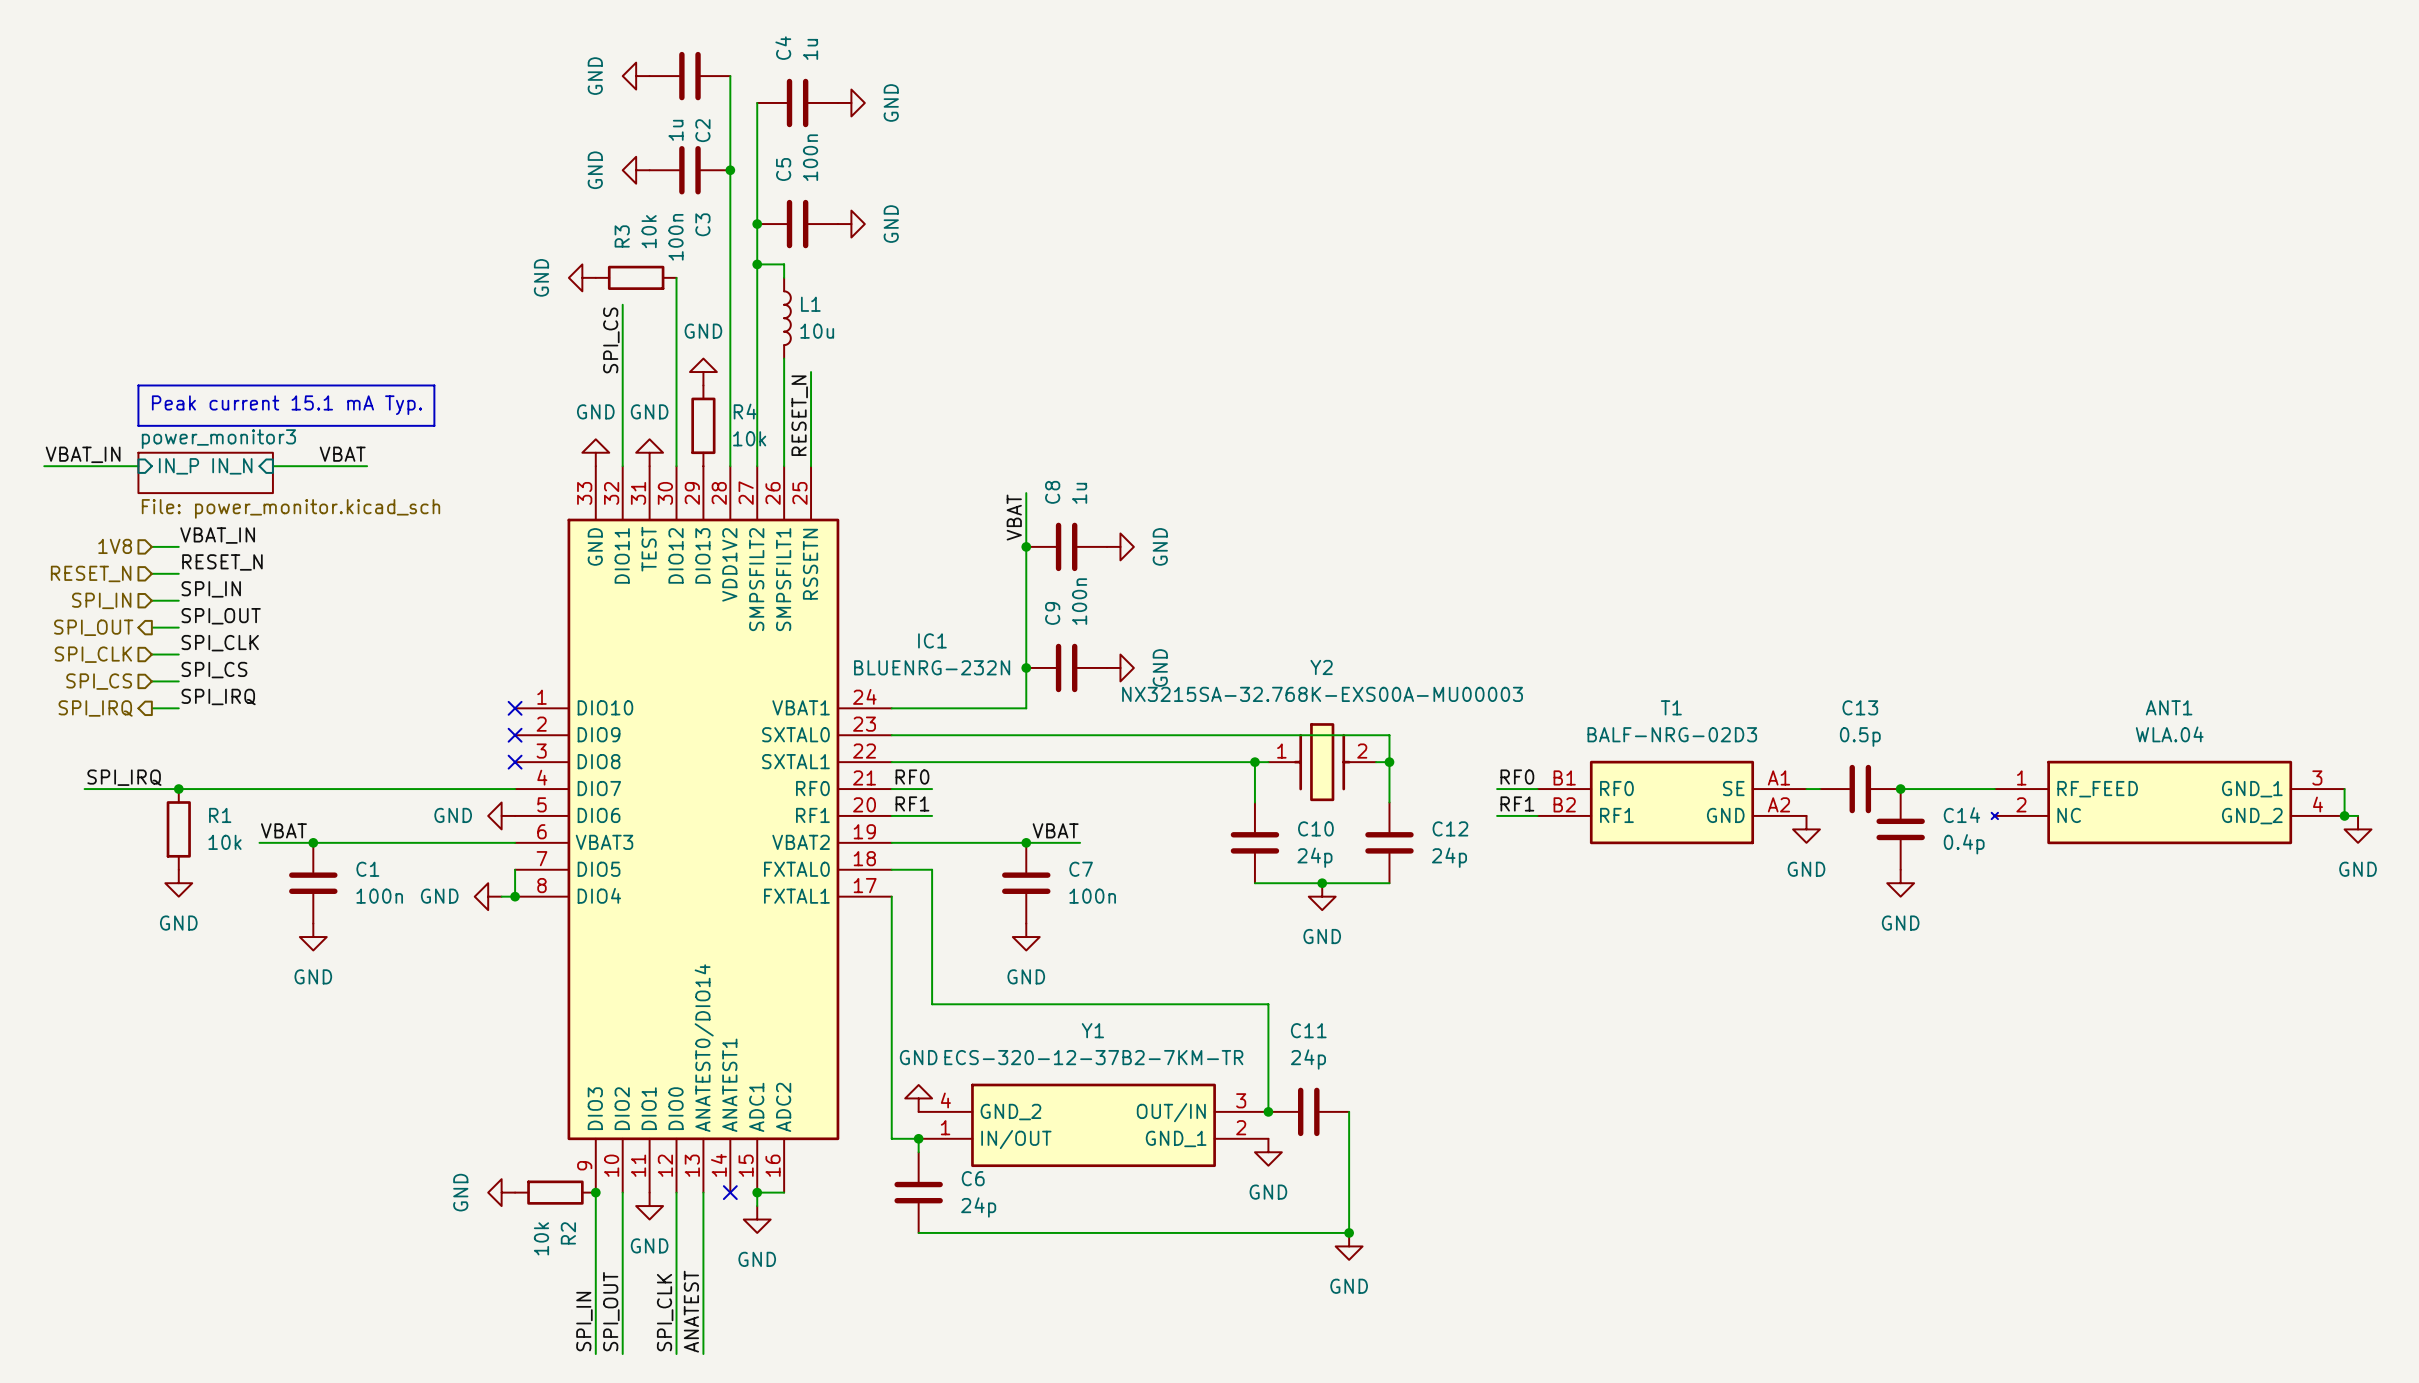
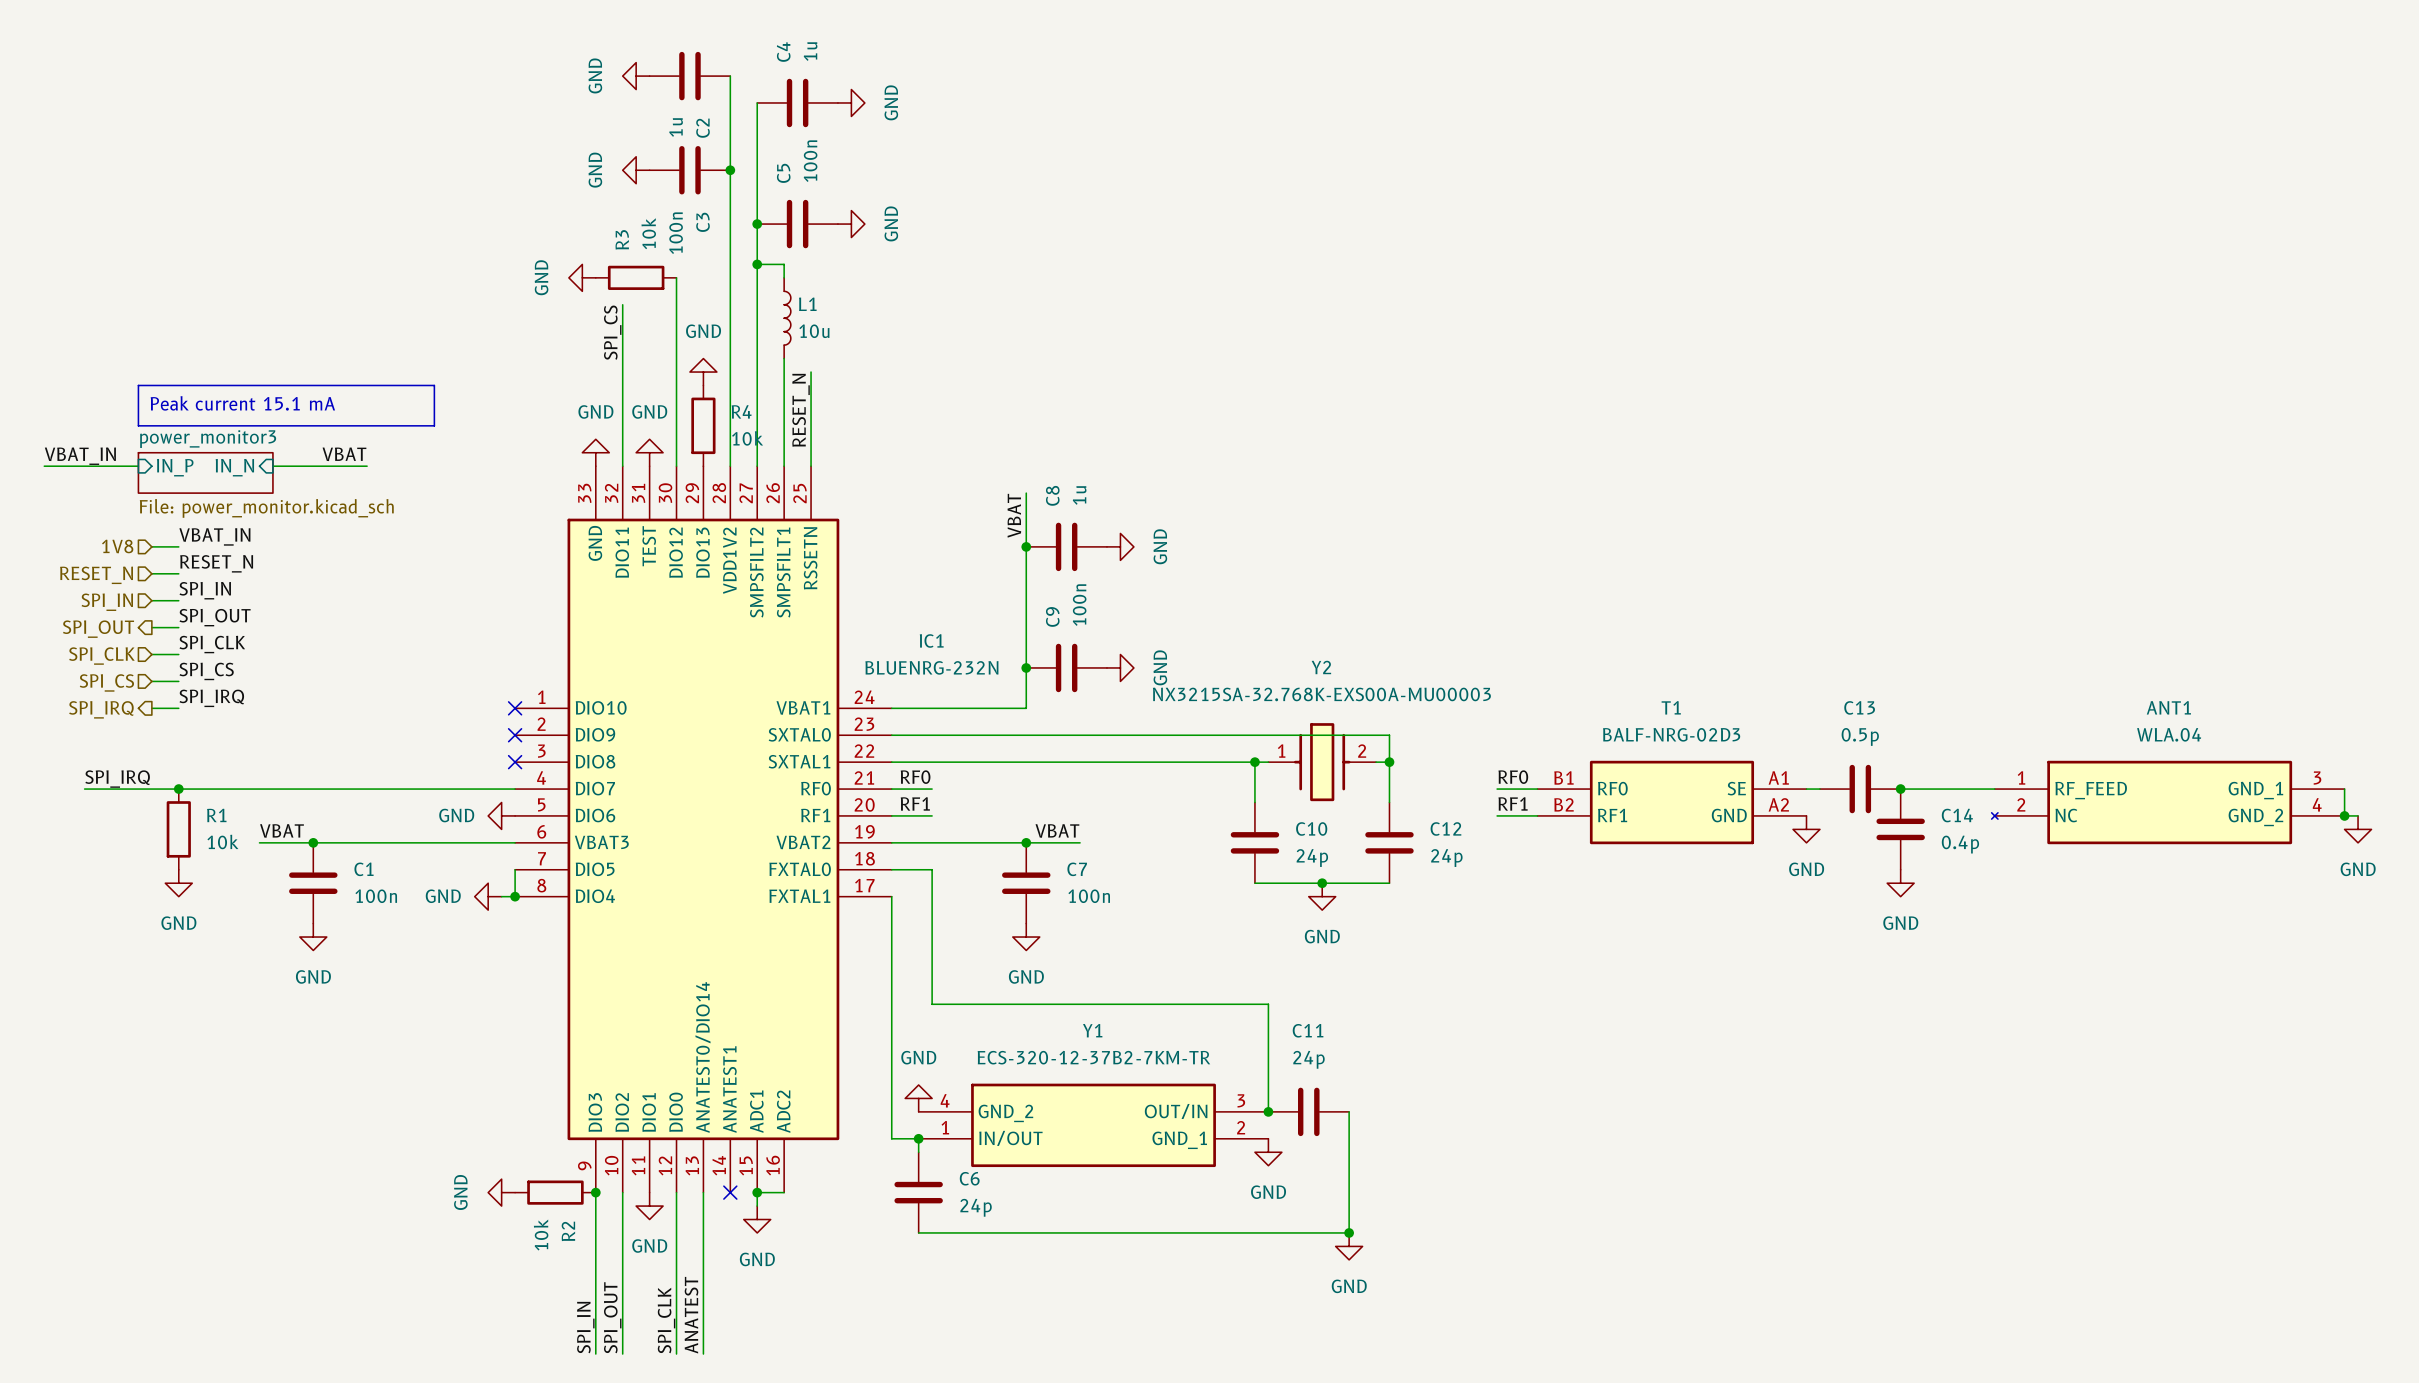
text: Peak current 15.1 mA Typ. (286, 405) -> Peak current 15.1 mA (242, 403)

